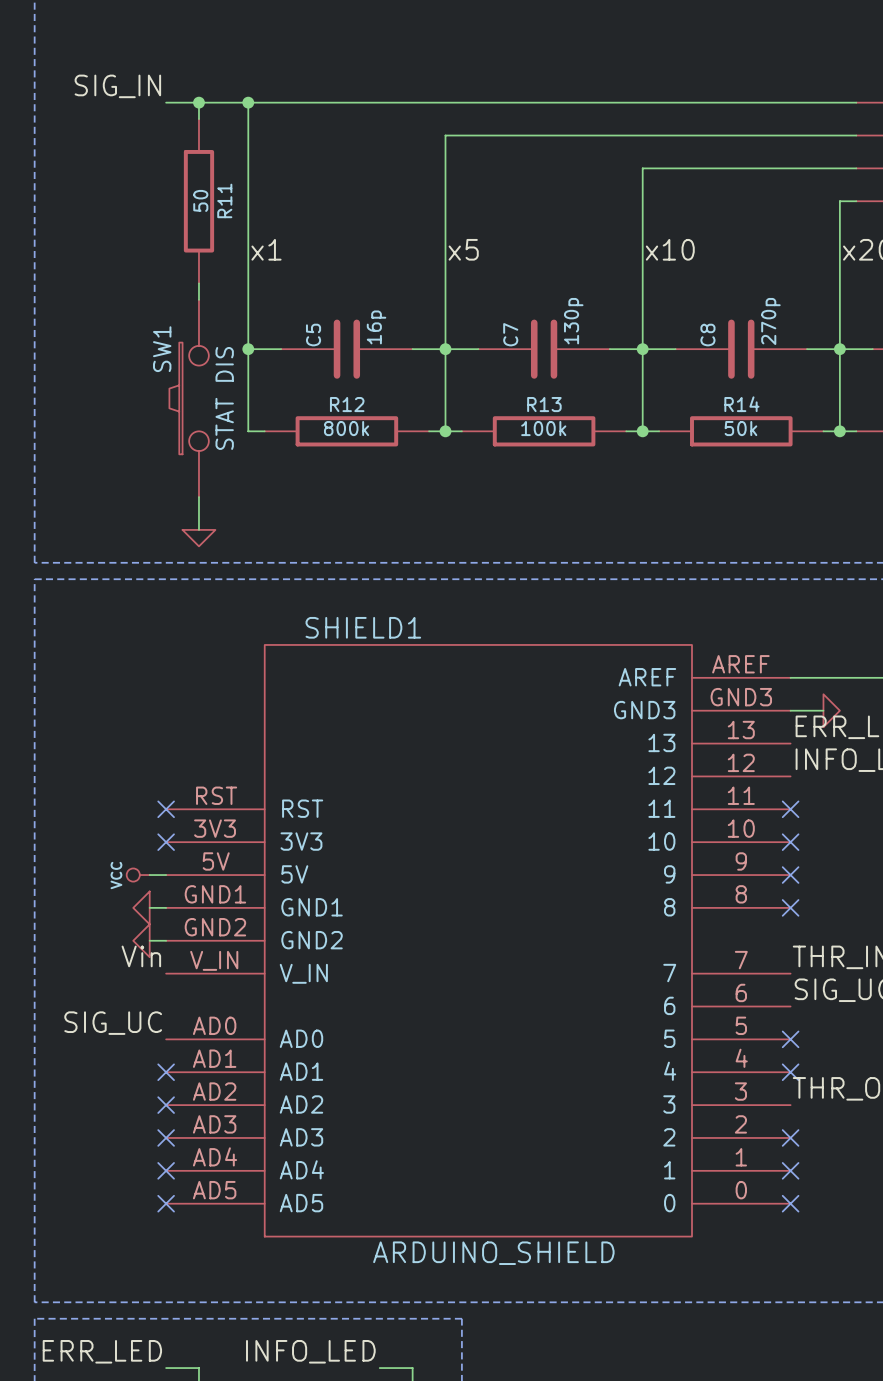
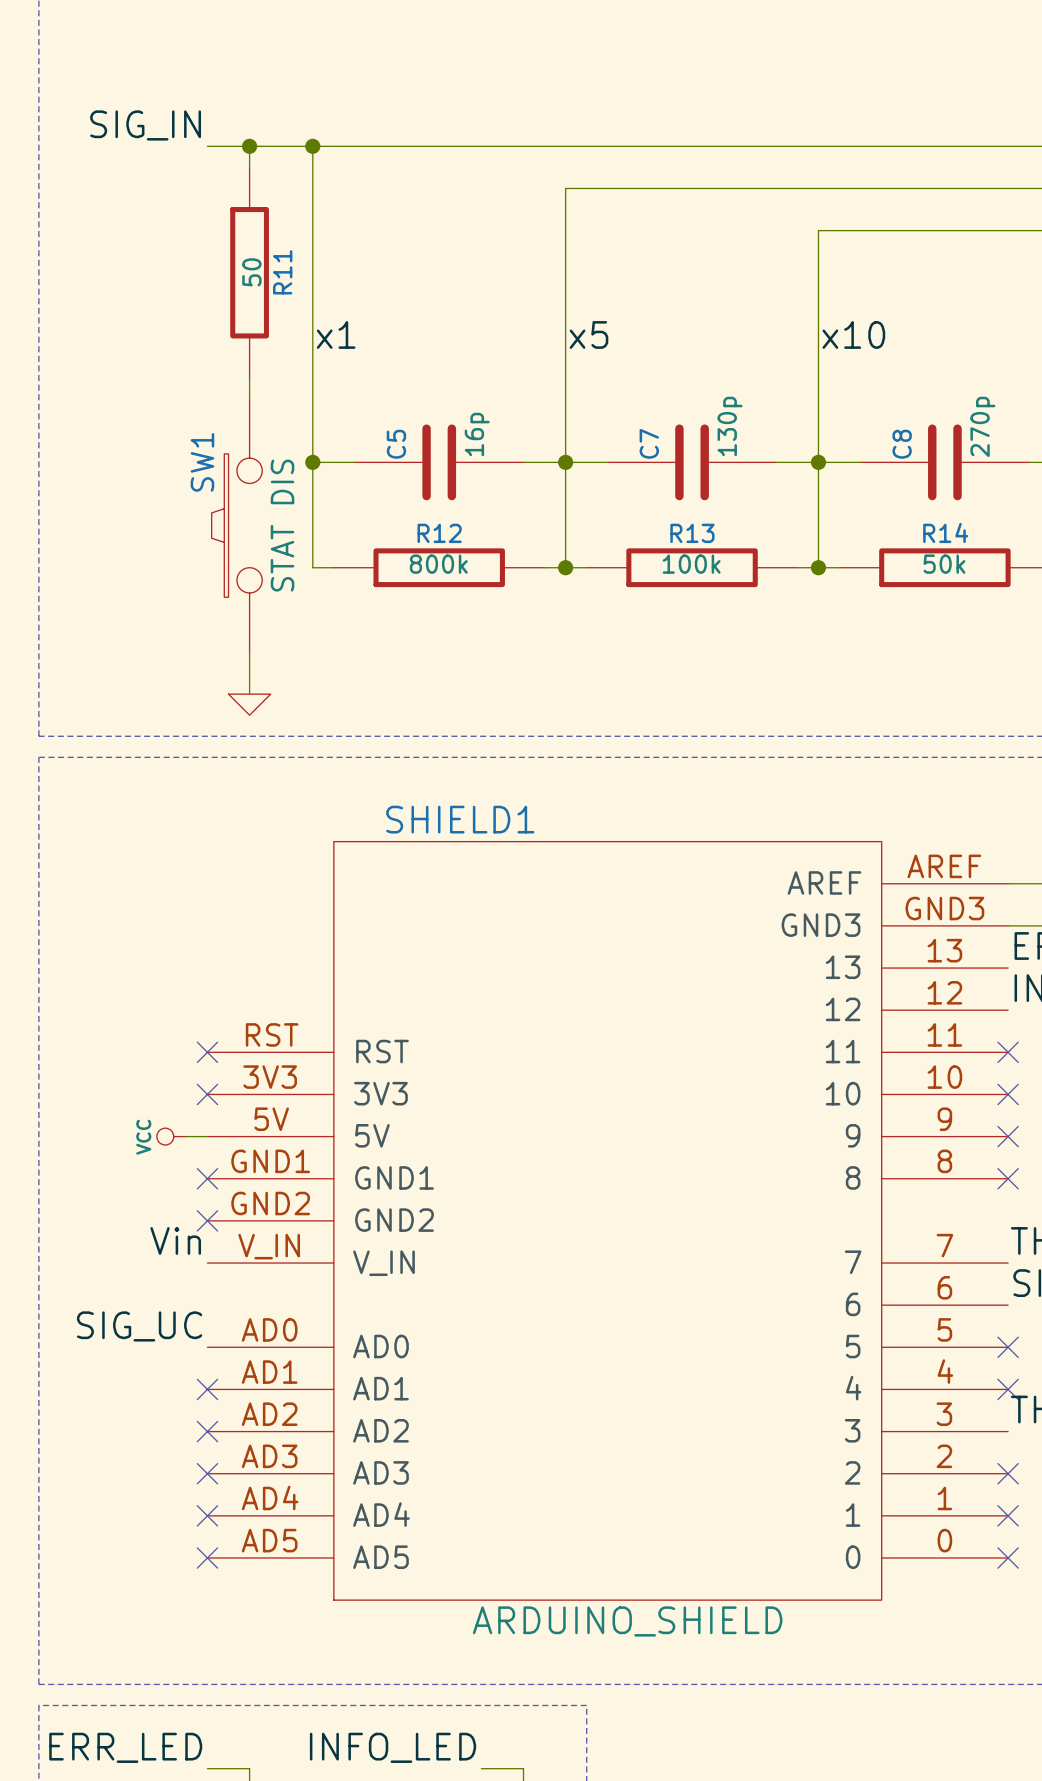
power symbol: (141, 907) -> none
wire: (149, 907) (166, 907) -> none
no-connect mark: none -> (207, 1178)
power symbol: (141, 940) -> none
wire: (149, 940) (166, 940) -> none
no-connect mark: none -> (207, 1220)

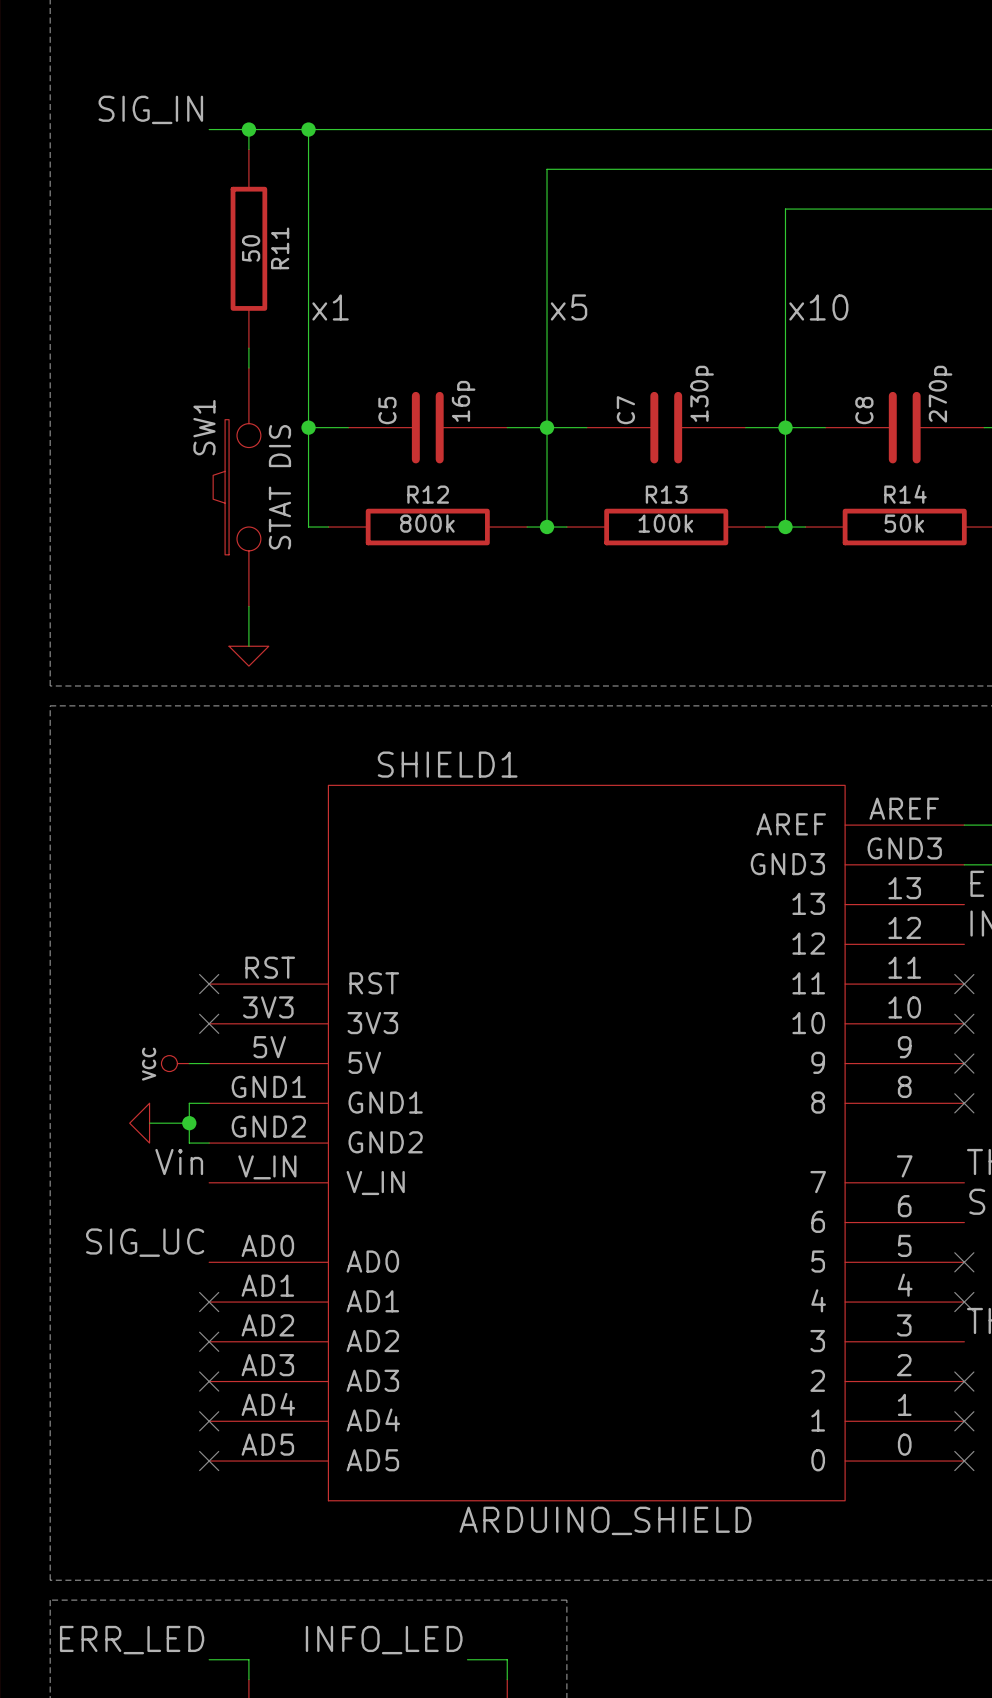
wire: none -> (209, 1103) (189, 1103) (189, 1143) (209, 1143)
no-connect mark: (207, 1178) -> none
power symbol: none -> (139, 1123)
wire: none -> (149, 1123) (189, 1123)
junction: none -> (189, 1123)
no-connect mark: (207, 1220) -> none

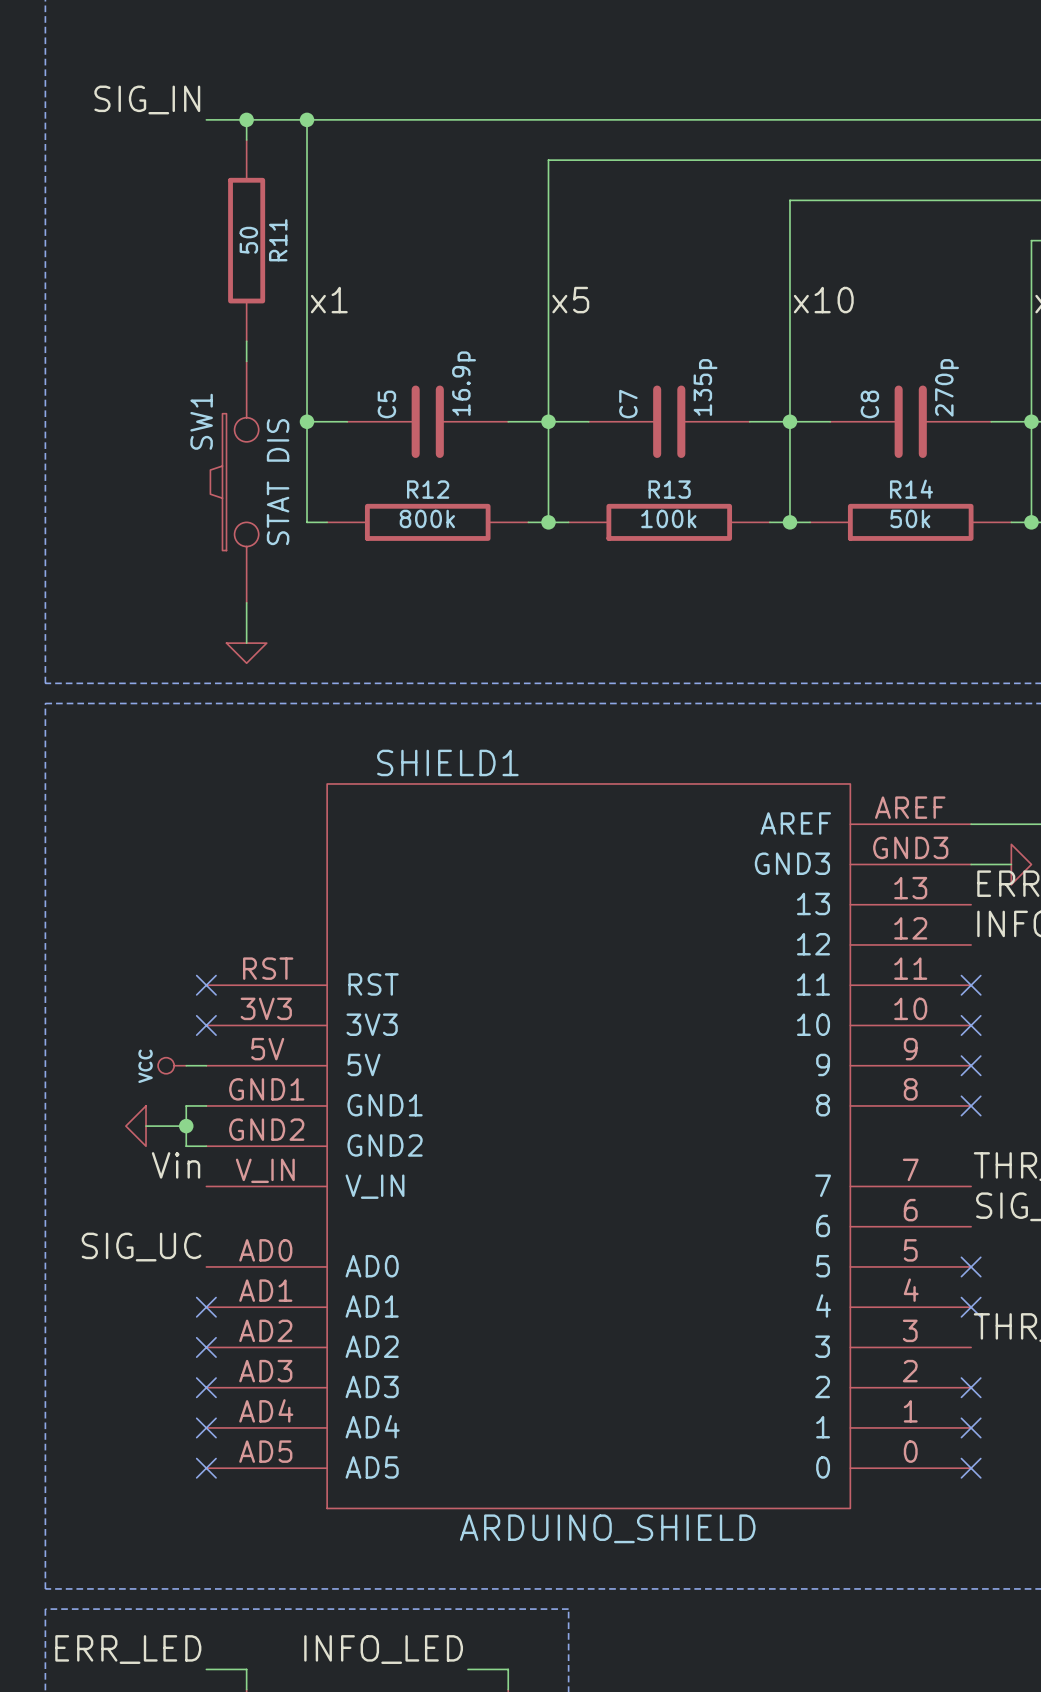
C7 value: 130p (702, 393) -> 135p (705, 387)
C5 value: 16p (463, 401) -> 16.9p (464, 383)

